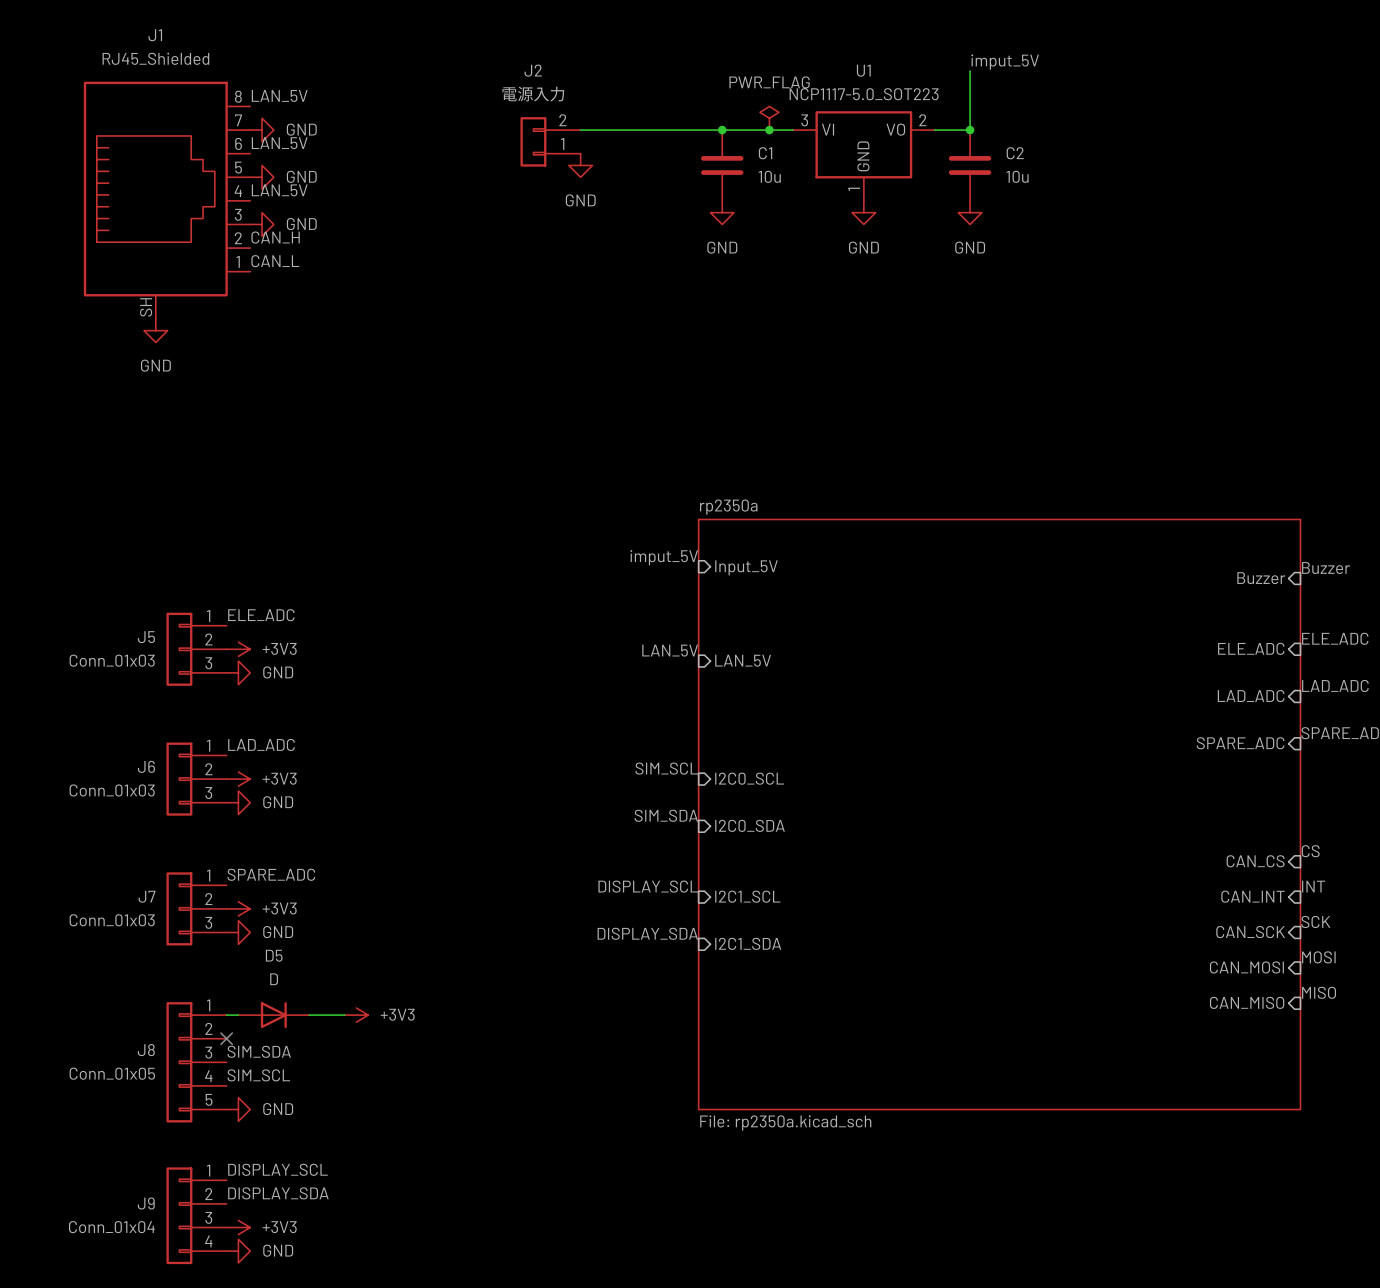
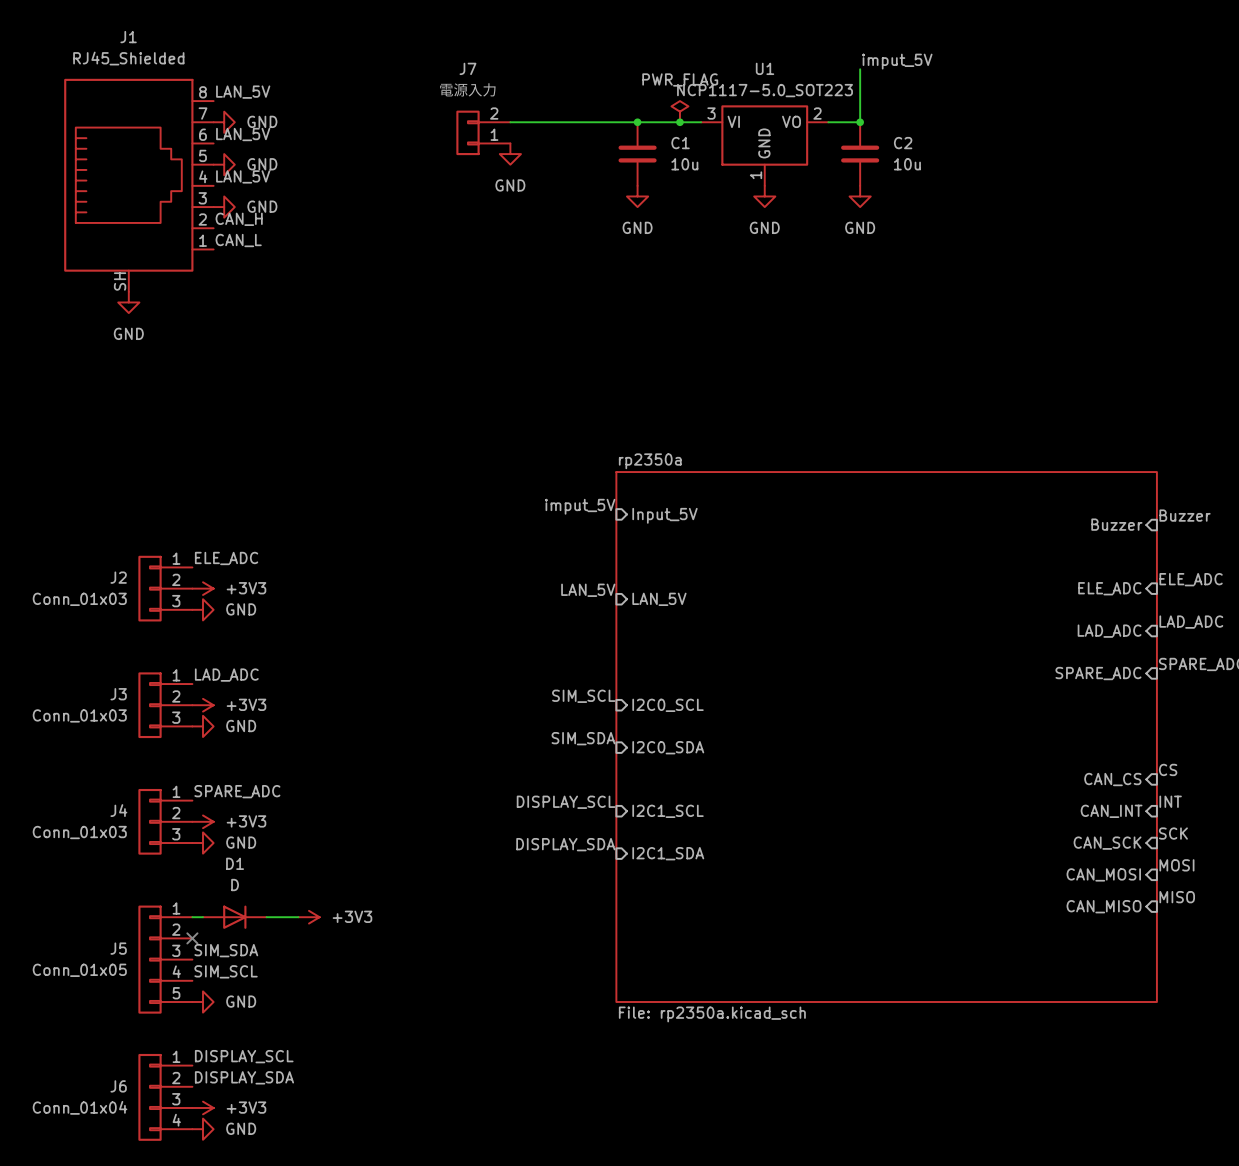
J2 name: J2 (533, 70) -> J7 (467, 68)
J5 name: J5 (146, 637) -> J2 (118, 577)
J6 name: J6 (146, 766) -> J3 (118, 694)
J7 name: J7 (147, 896) -> J4 (118, 810)
D5 name: D5 (274, 955) -> D1 (235, 863)
J8 name: J8 (146, 1050) -> J5 (118, 948)
J9 name: J9 (146, 1203) -> J6 (118, 1086)

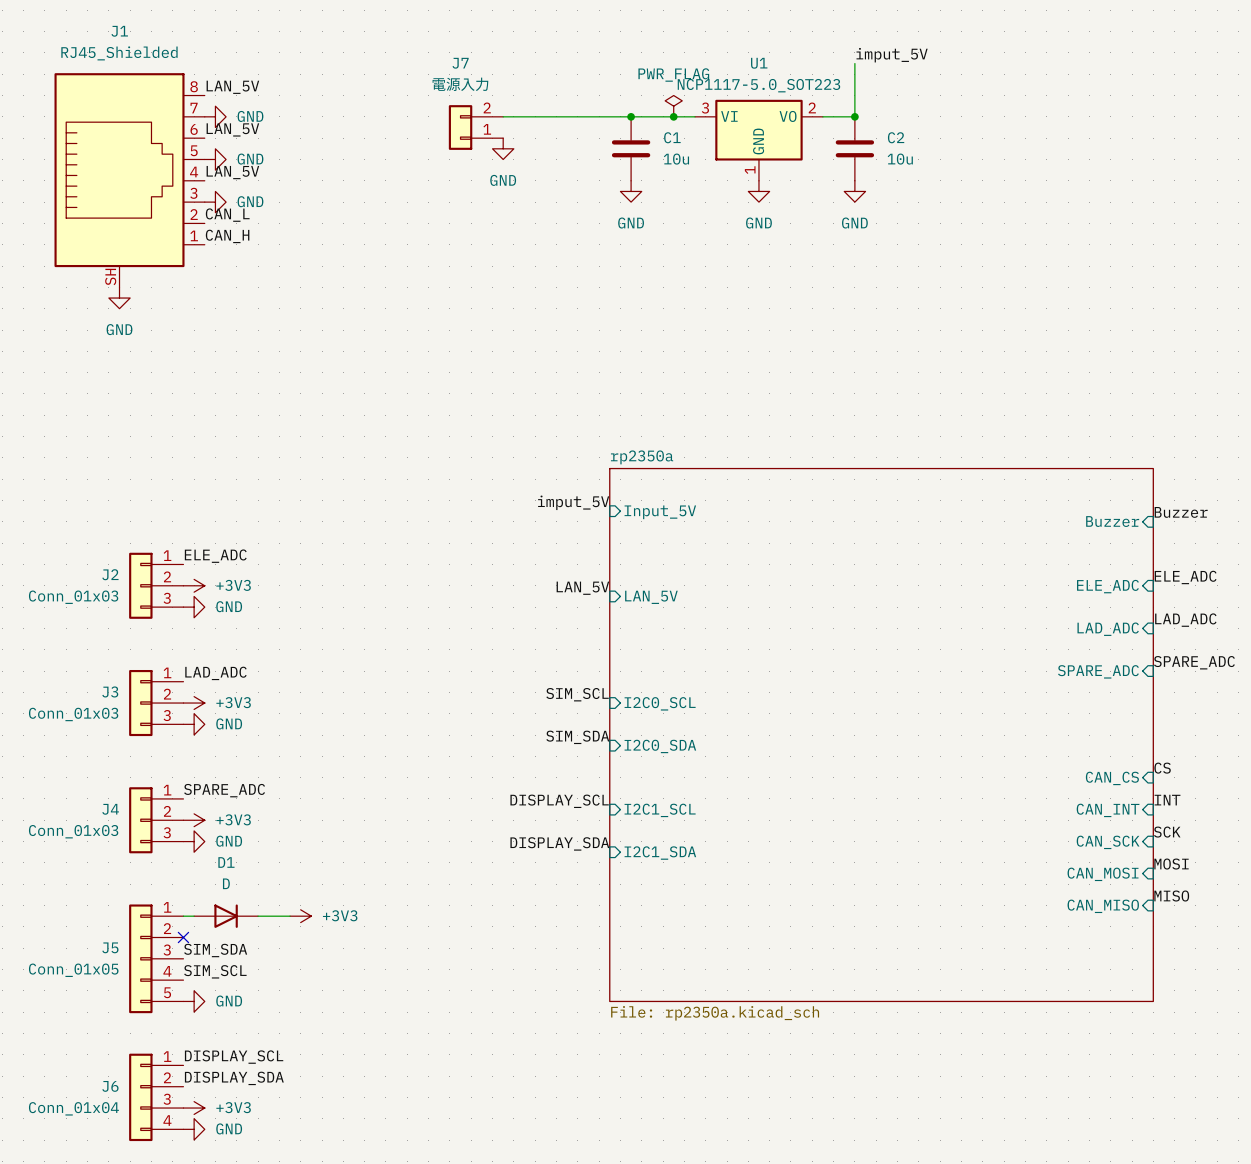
label: CAN_H (239, 219) -> CAN_L (227, 215)
label: CAN_L (238, 240) -> CAN_H (227, 236)

